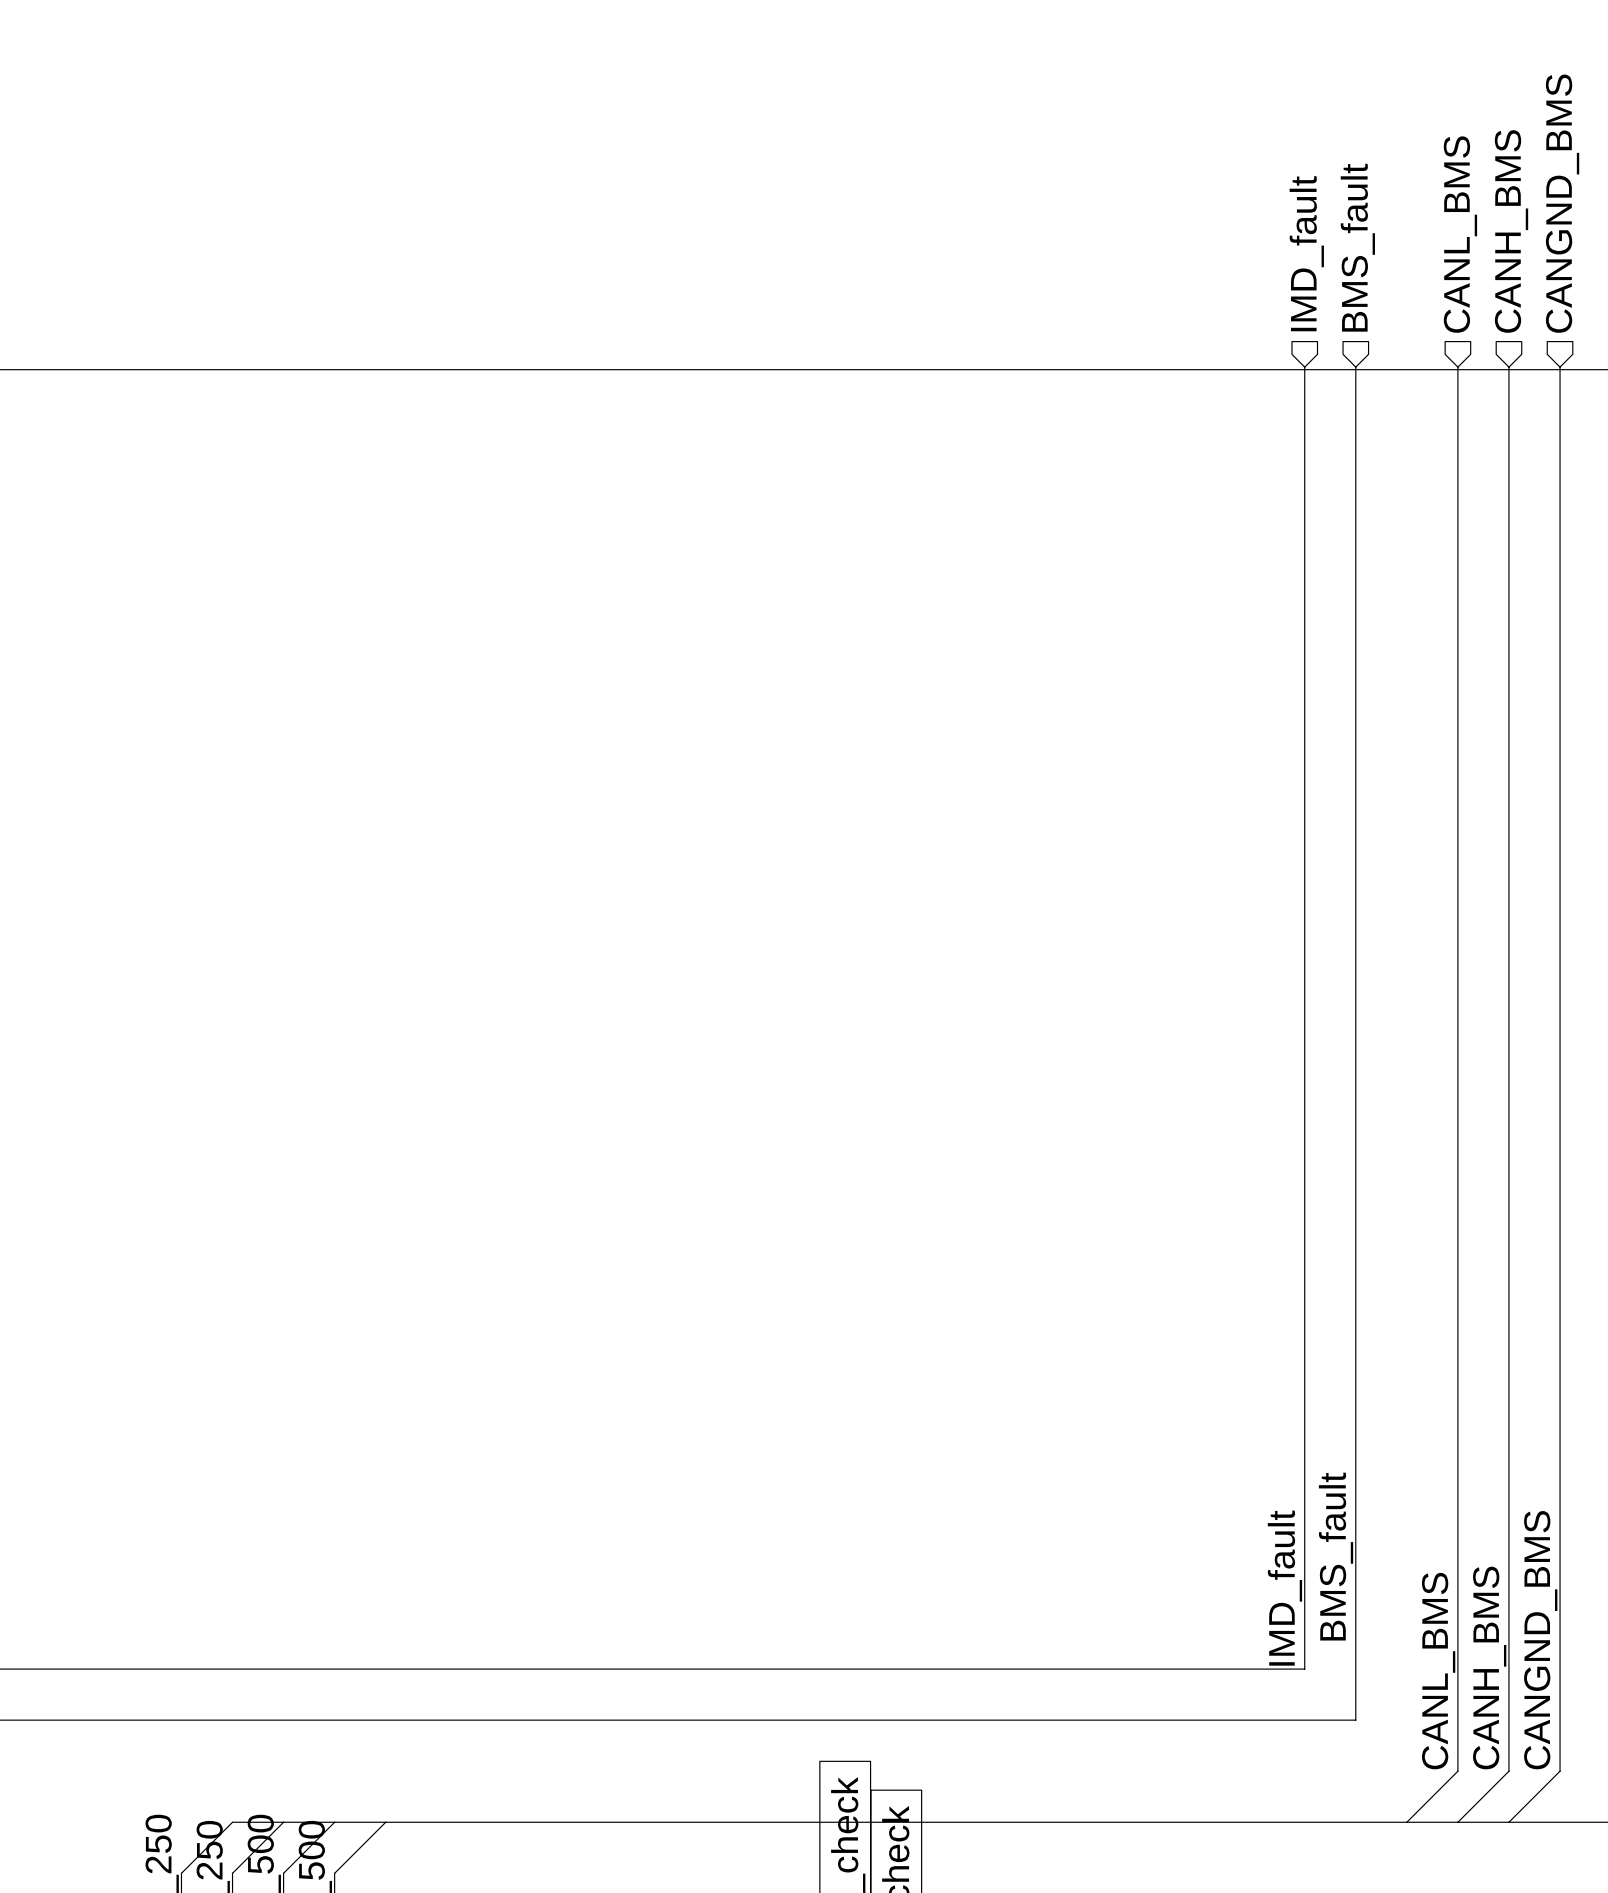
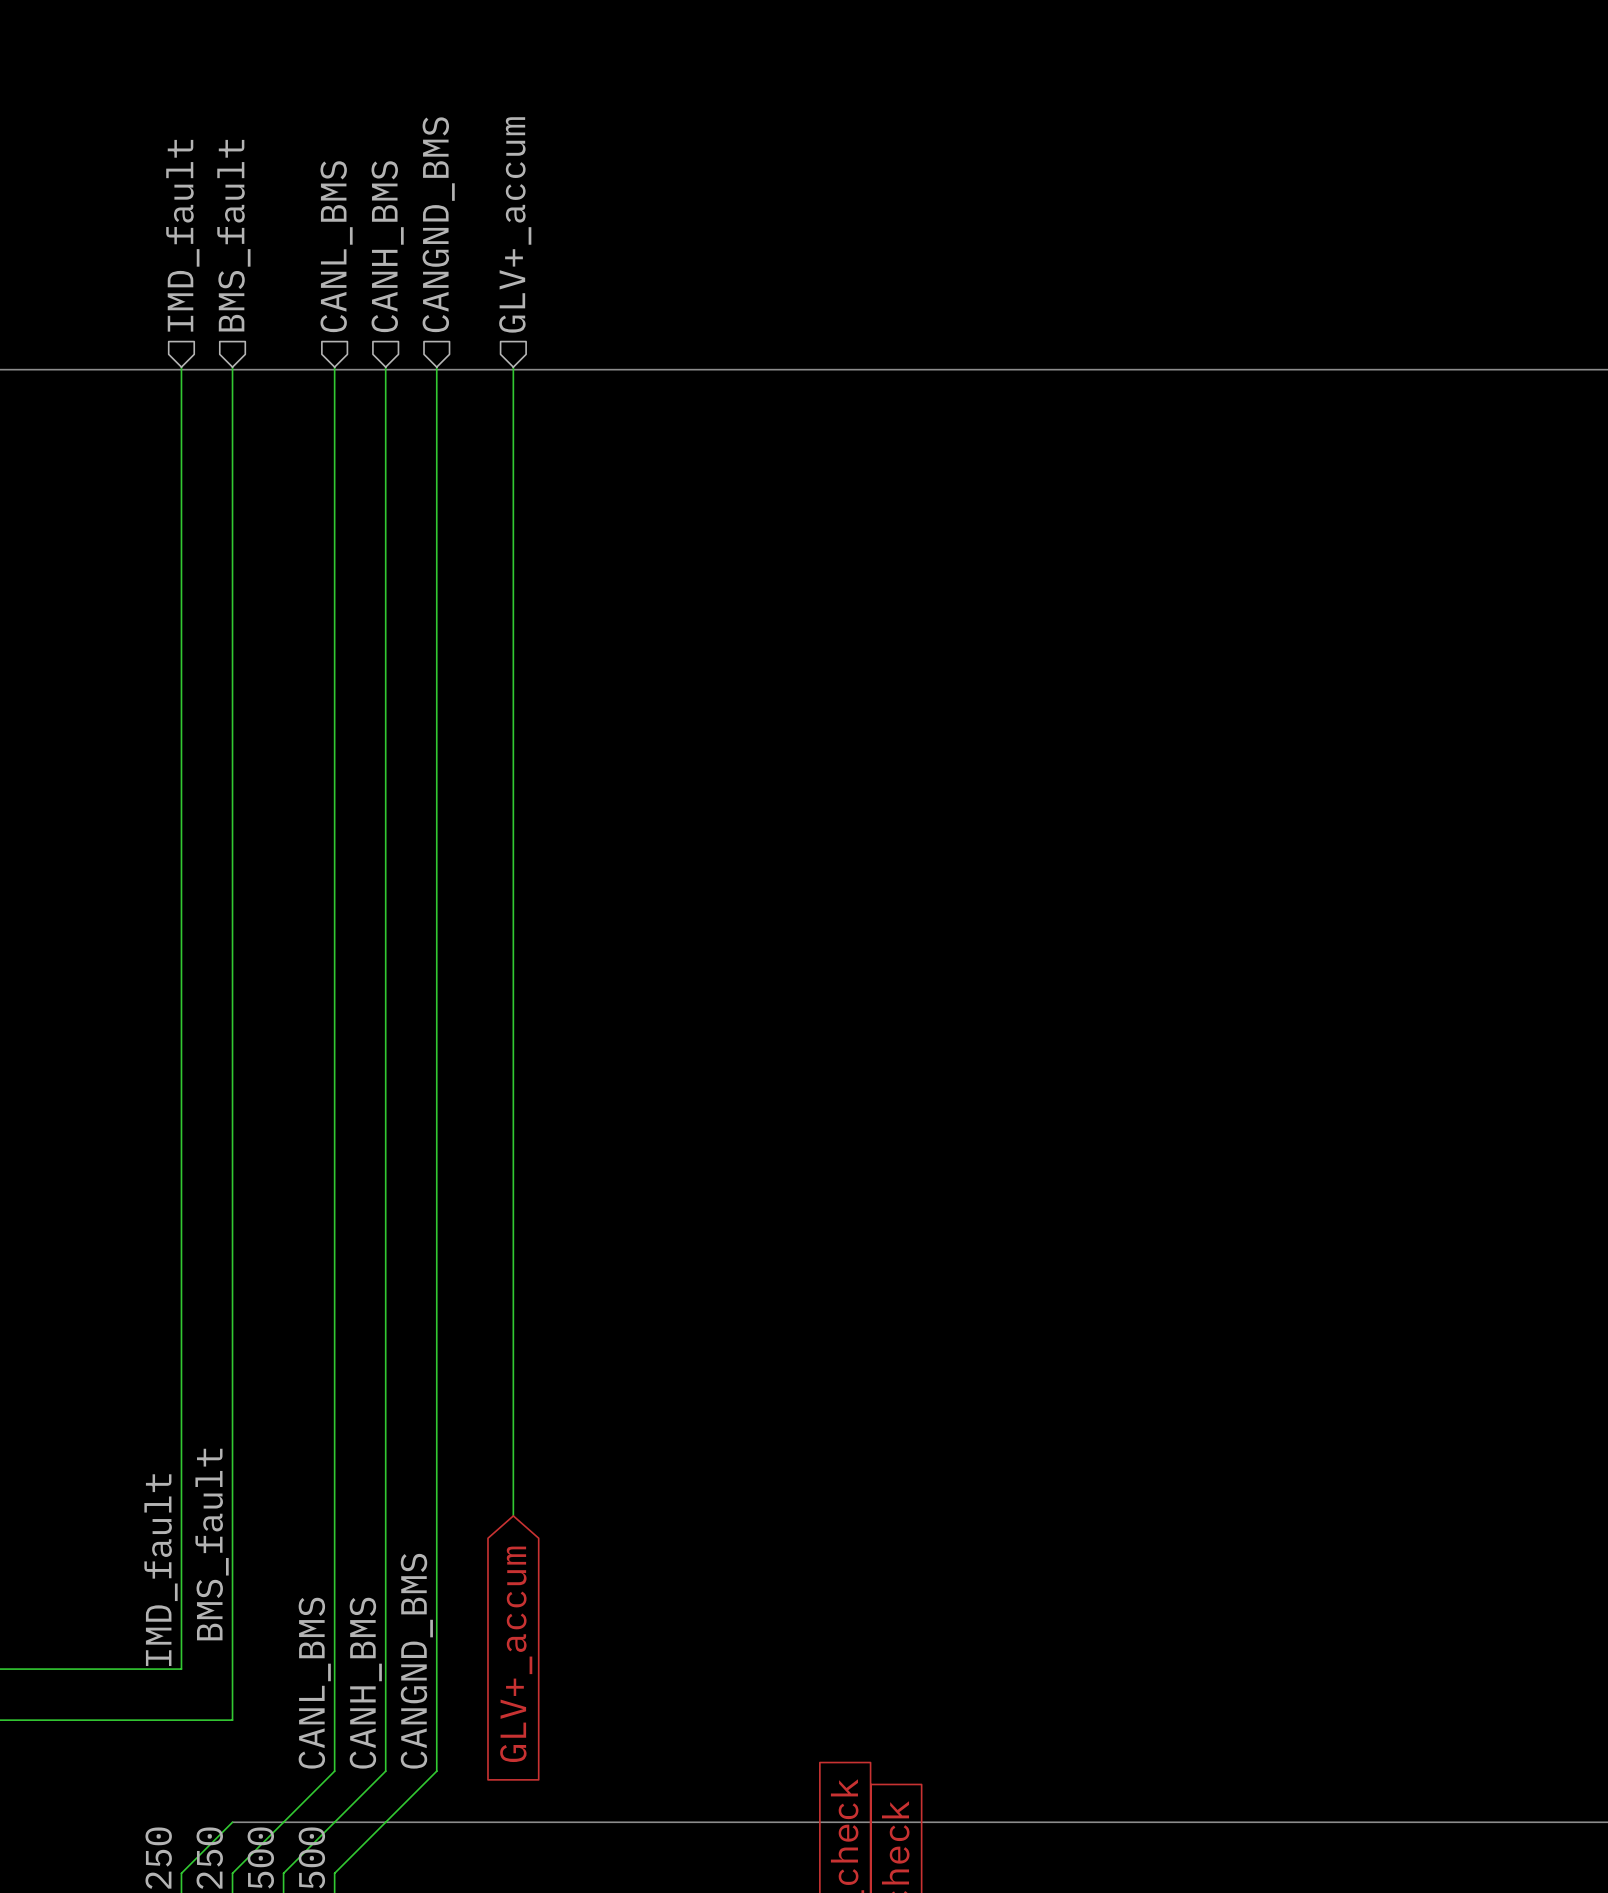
hierarchical label: none -> CANGND_BMS (438, 224)
hierarchical label: CANGND_BMS (1562, 203) -> none
hierarchical label: none -> GLV+_accum (515, 224)
hierarchical label: none -> CANH_BMS (387, 246)
hierarchical label: CANH_BMS (1511, 231) -> none
hierarchical label: none -> CANL_BMS (336, 246)
hierarchical label: CANL_BMS (1460, 234) -> none
hierarchical label: none -> BMS_fault (233, 235)
hierarchical label: BMS_fault (1357, 247) -> none
hierarchical label: none -> IMD_fault (182, 235)
hierarchical label: IMD_fault (1306, 253) -> none
wire: none -> (334, 367) (334, 1771) (283, 1822)
wire: none -> (385, 367) (385, 1771) (334, 1822)
wire: none -> (436, 367) (436, 1771) (385, 1822)
wire: none -> (513, 367) (513, 1515)
wire: (1304, 367) (1304, 1669) (181, 1669) -> (181, 367) (181, 1669)
wire: (1355, 367) (1355, 1720) (232, 1720) -> (232, 367) (232, 1720)
wire: (1457, 367) (1457, 1771) (1406, 1822) -> none
wire: (1508, 367) (1508, 1771) (1457, 1822) -> none
wire: (1560, 367) (1560, 1771) (1508, 1822) -> none
label: none -> BMS_fault (212, 1544)
label: BMS_fault (1336, 1556) -> none
label: none -> IMD_fault (161, 1570)
label: IMD_fault (1284, 1588) -> none
label: none -> CANGND_BMS (416, 1661)
label: CANGND_BMS (1540, 1640) -> none
global label: none -> GLV+_accum (516, 1654)
label: none -> CANH_BMS (365, 1683)
label: CANH_BMS (1489, 1668) -> none
label: none -> CANL_BMS (314, 1683)
label: CANL_BMS (1438, 1671) -> none

